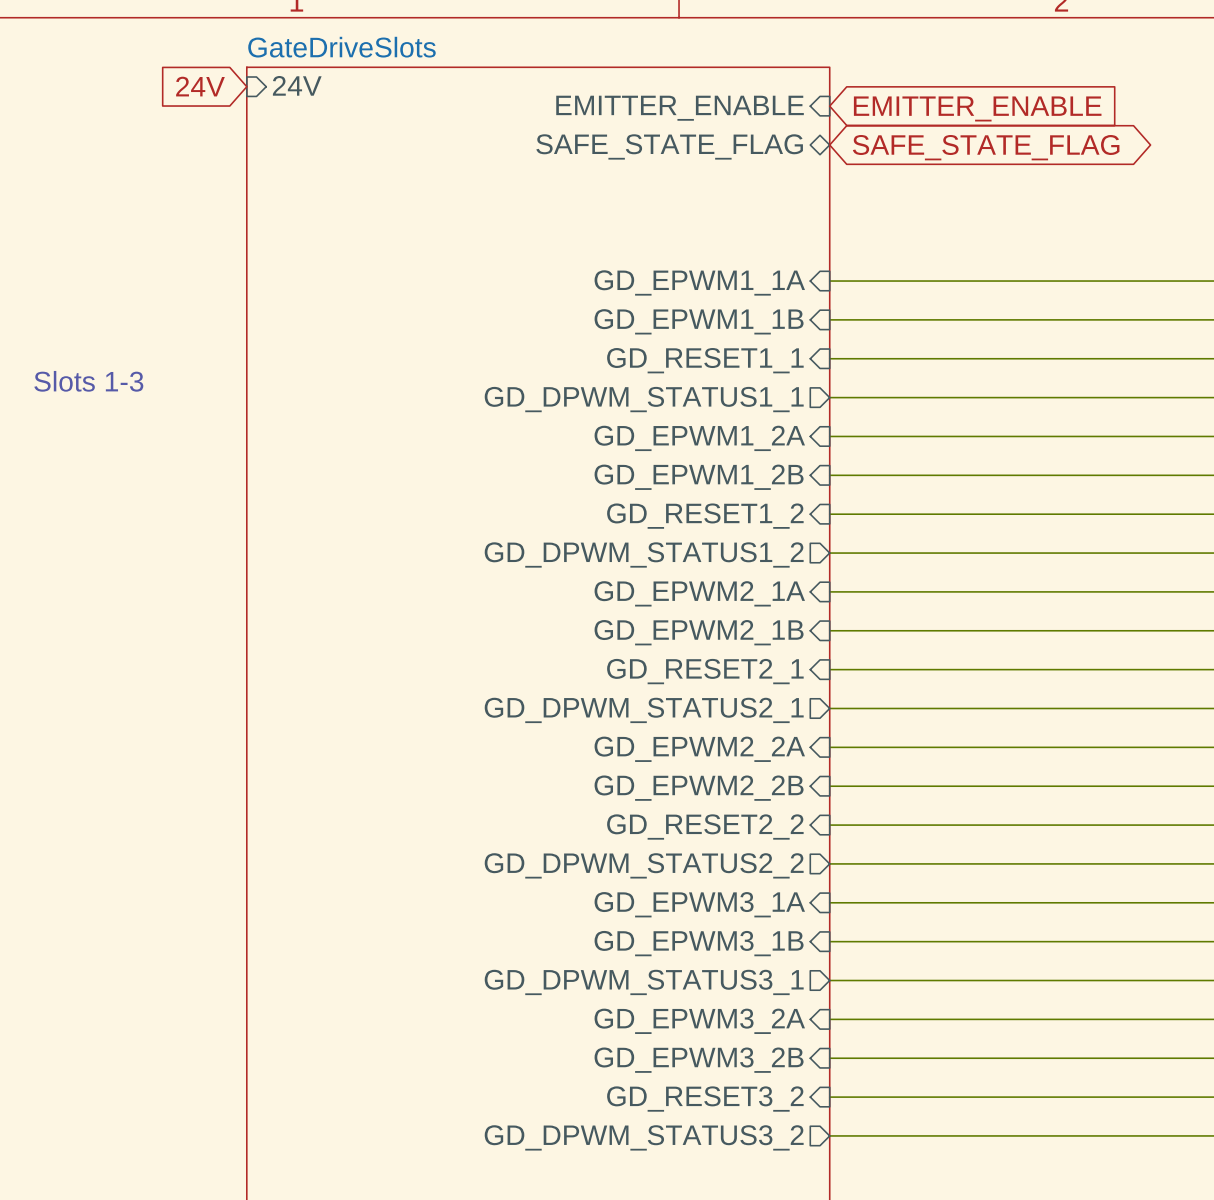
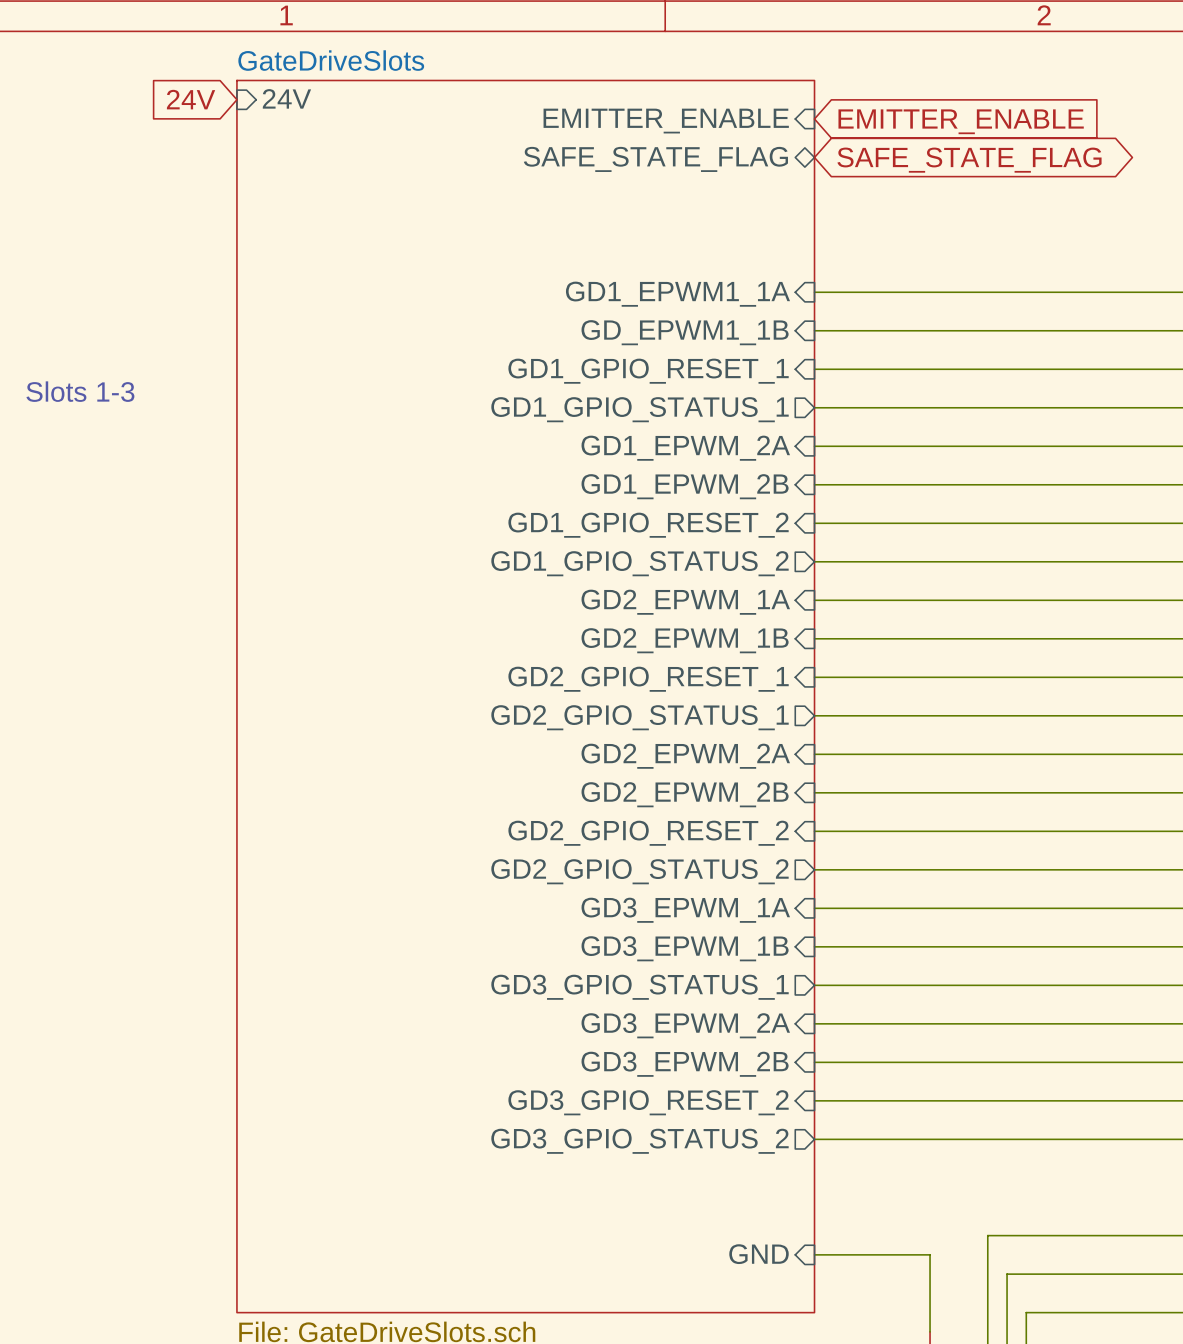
sheet pin: GD_EPWM1_1A (699, 282) -> GD1_EPWM1_1A (677, 294)
sheet pin: GD_RESET1_1 (705, 360) -> GD1_GPIO_RESET_1 (648, 371)
sheet pin: GD_DPWM_STATUS1_1 (644, 399) -> GD1_GPIO_STATUS_1 (640, 409)
sheet pin: GD_EPWM1_2A (699, 438) -> GD1_EPWM_2A (685, 448)
sheet pin: GD_EPWM1_2B (699, 477) -> GD1_EPWM_2B (685, 486)
sheet pin: GD_RESET1_2 (705, 516) -> GD1_GPIO_RESET_2 (648, 525)
sheet pin: GD_DPWM_STATUS1_2 (644, 554) -> GD1_GPIO_STATUS_2 (639, 563)
sheet pin: GD_EPWM2_1A (699, 593) -> GD2_EPWM_1A (685, 602)
sheet pin: GD_EPWM2_1B (699, 632) -> GD2_EPWM_1B (685, 640)
sheet pin: GD_RESET2_1 (705, 671) -> GD2_GPIO_RESET_1 (648, 679)
sheet pin: GD_DPWM_STATUS2_1 (644, 710) -> GD2_GPIO_STATUS_1 (640, 717)
sheet pin: GD_EPWM2_2A (699, 749) -> GD2_EPWM_2A (685, 756)
sheet pin: GD_EPWM2_2B (699, 788) -> GD2_EPWM_2B (685, 794)
sheet pin: GD_RESET2_2 (705, 827) -> GD2_GPIO_RESET_2 (648, 833)
sheet pin: GD_DPWM_STATUS2_2 (644, 865) -> GD2_GPIO_STATUS_2 (639, 871)
sheet pin: GD_EPWM3_1A (699, 904) -> GD3_EPWM_1A (685, 910)
sheet pin: GD_EPWM3_1B (699, 943) -> GD3_EPWM_1B (685, 948)
sheet pin: GD_DPWM_STATUS3_1 (644, 982) -> GD3_GPIO_STATUS_1 (640, 987)
sheet pin: GD_EPWM3_2A (699, 1021) -> GD3_EPWM_2A (685, 1025)
sheet pin: GD_EPWM3_2B (699, 1060) -> GD3_EPWM_2B (685, 1064)
sheet pin: GD_RESET3_2 (705, 1099) -> GD3_GPIO_RESET_2 (648, 1102)
sheet pin: GD_DPWM_STATUS3_2 (644, 1137) -> GD3_GPIO_STATUS_2 (639, 1141)

